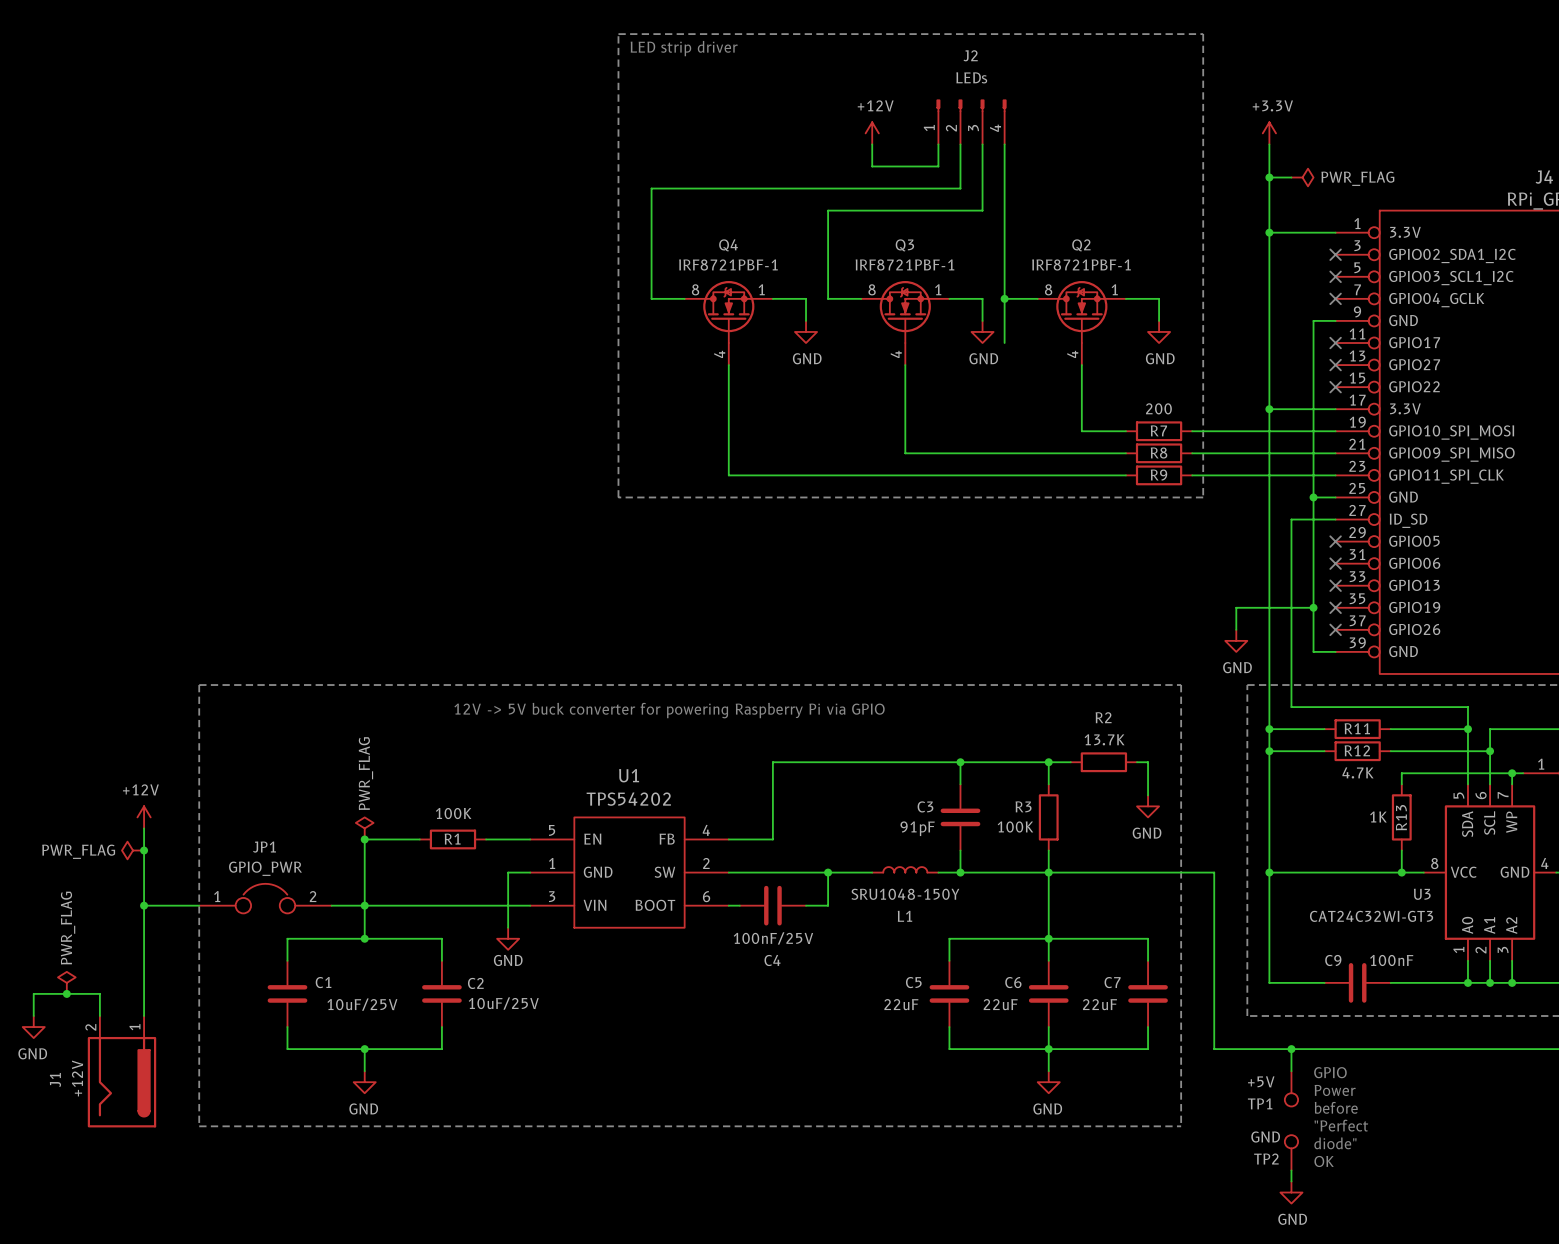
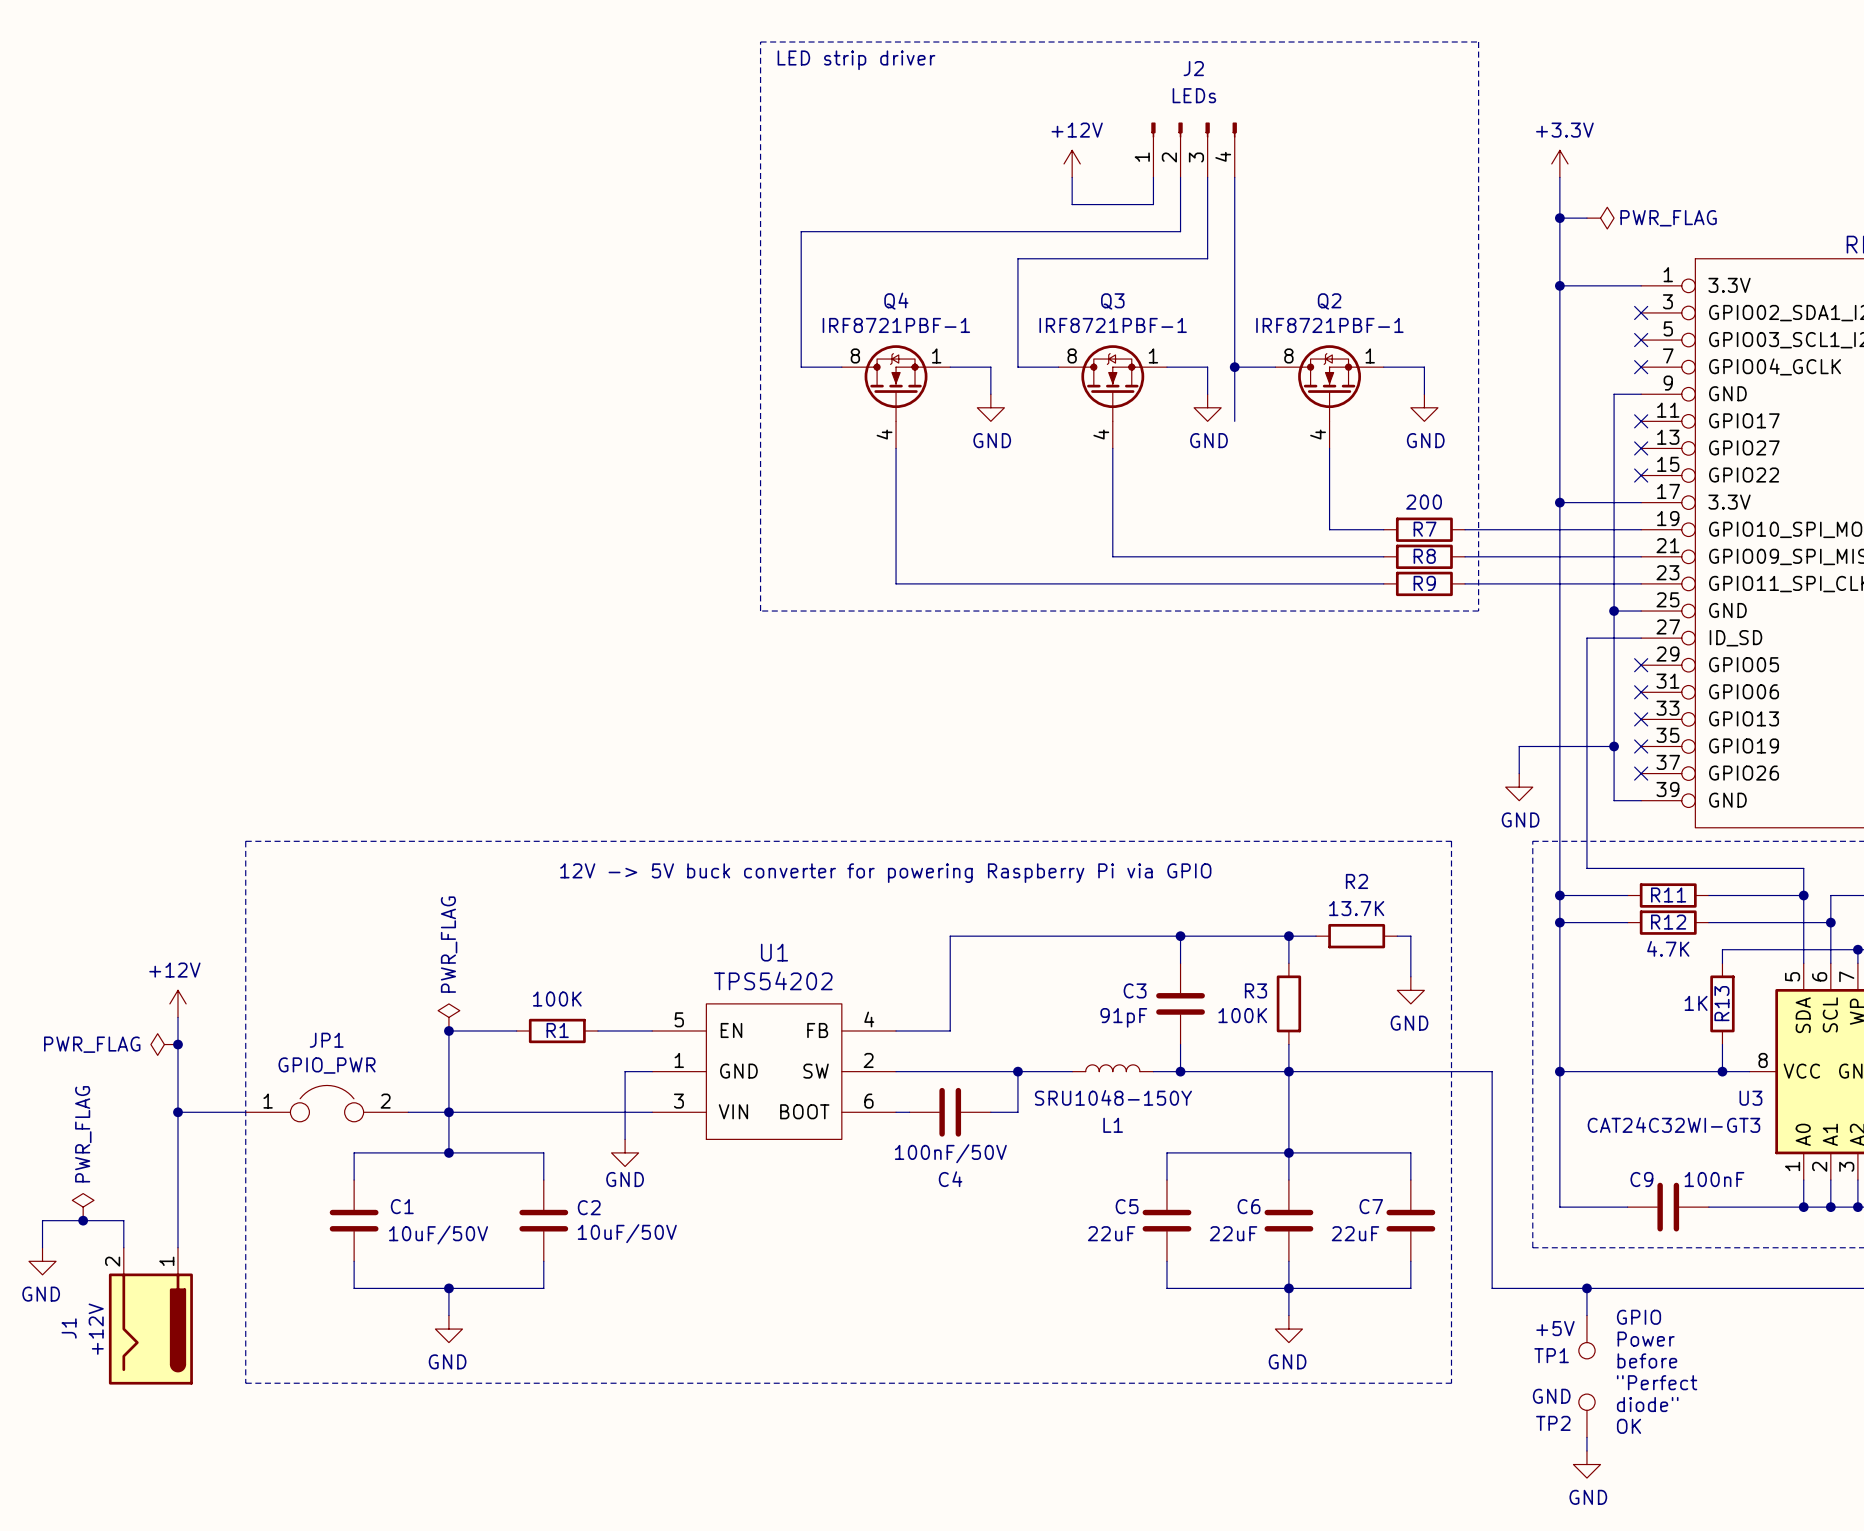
C4 value: 100nF/25V (773, 938) -> 100nF/50V (950, 1153)
C2 value: 10uF/25V (503, 1003) -> 10uF/50V (627, 1233)
C1 value: 10uF/25V (362, 1004) -> 10uF/50V (438, 1234)

